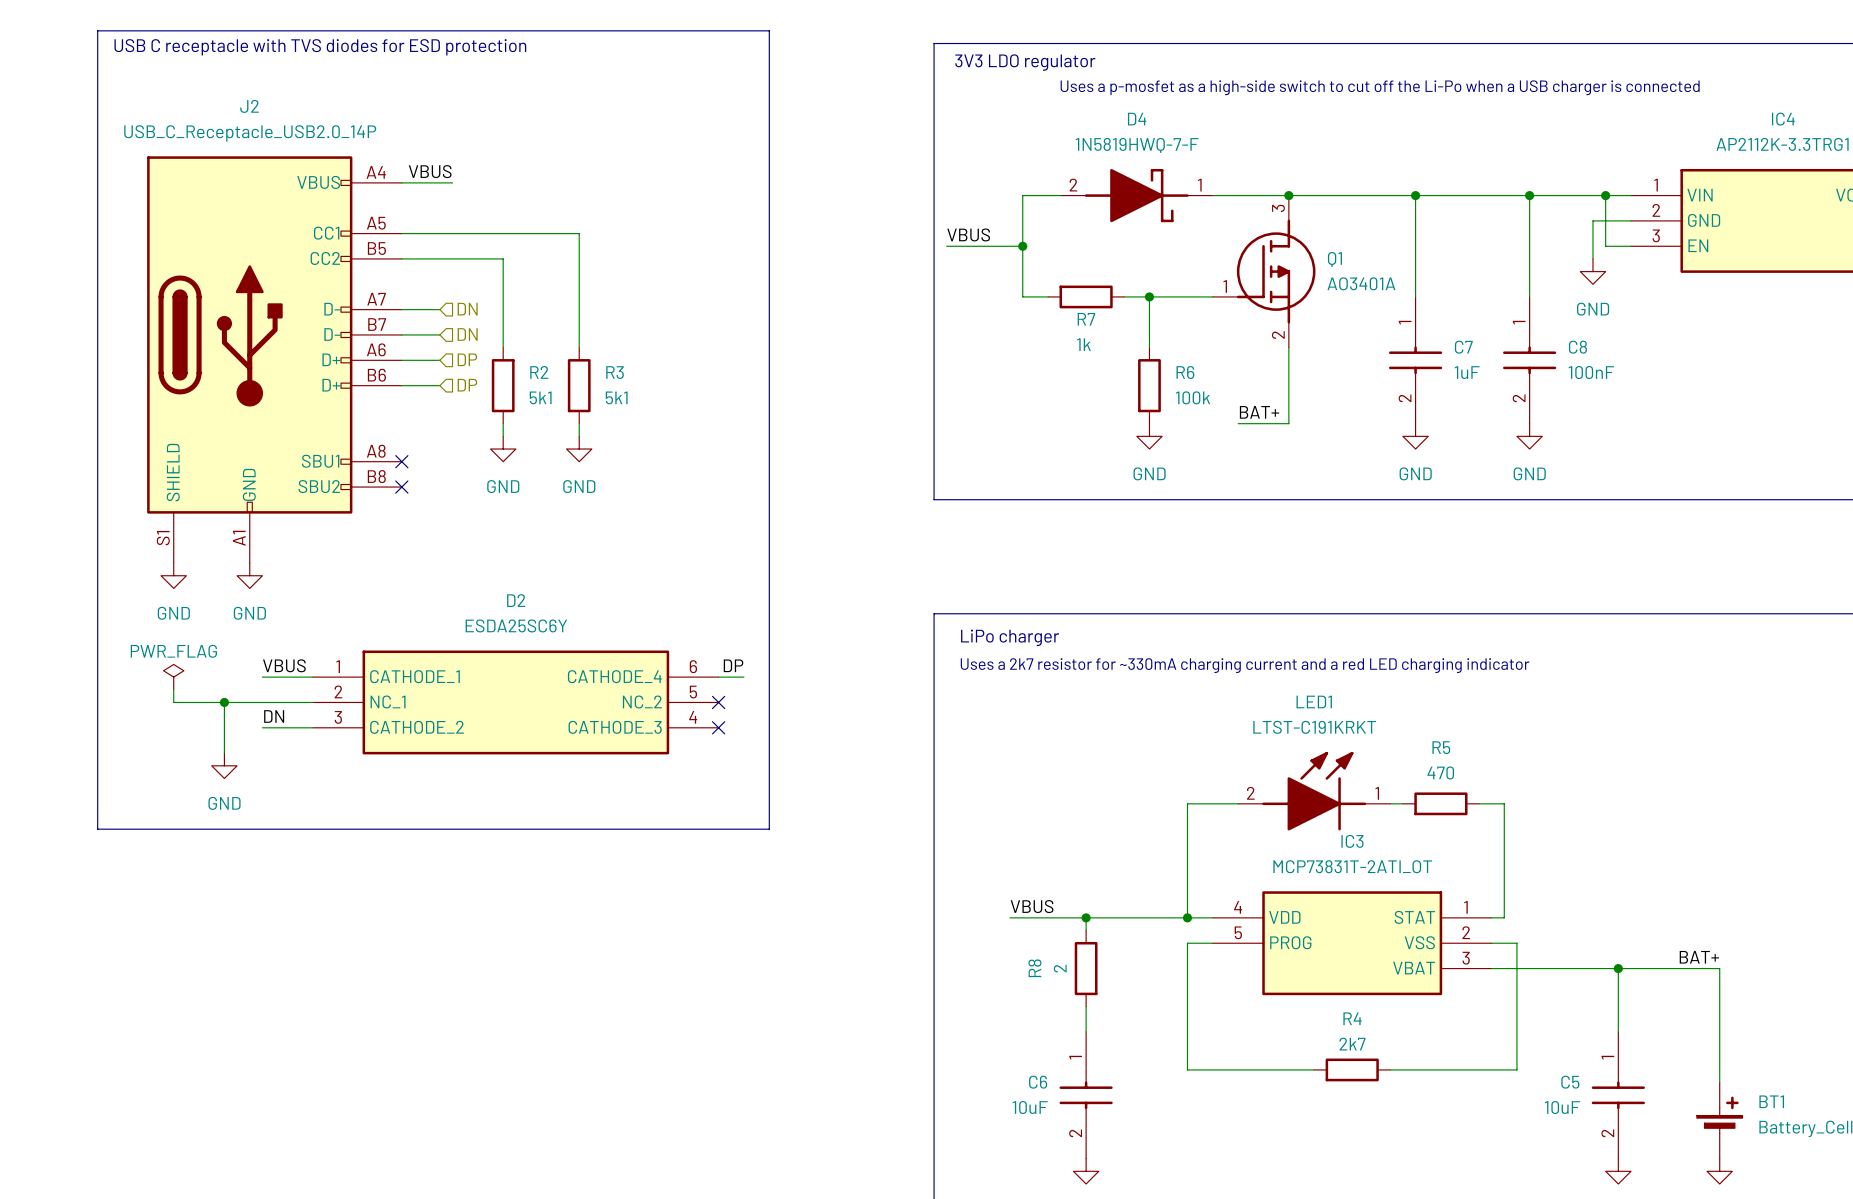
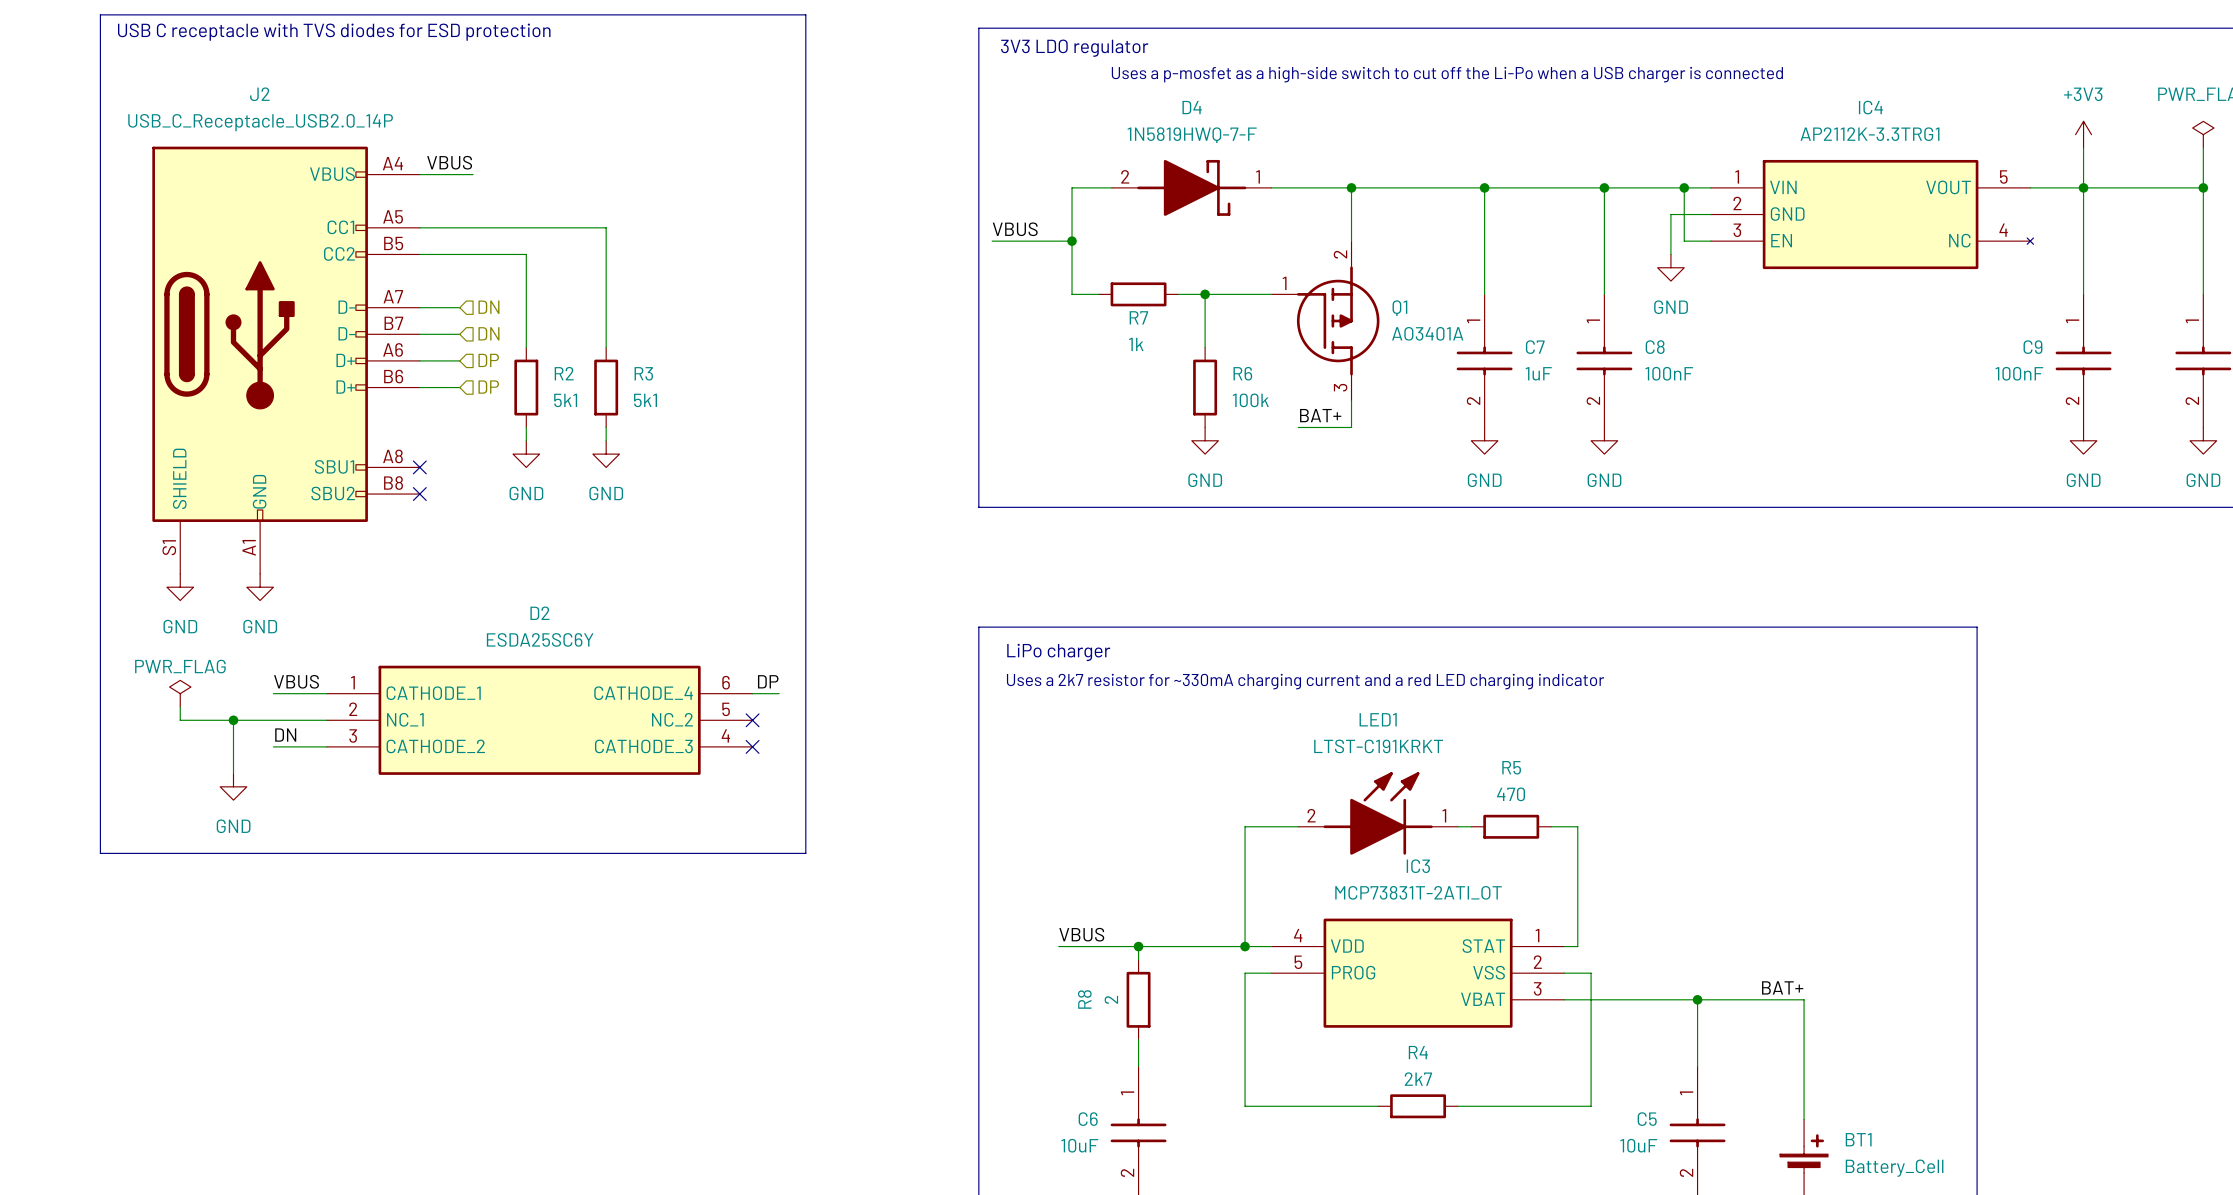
Q1 flip: as is (1276, 271) -> up-down (1338, 321)

